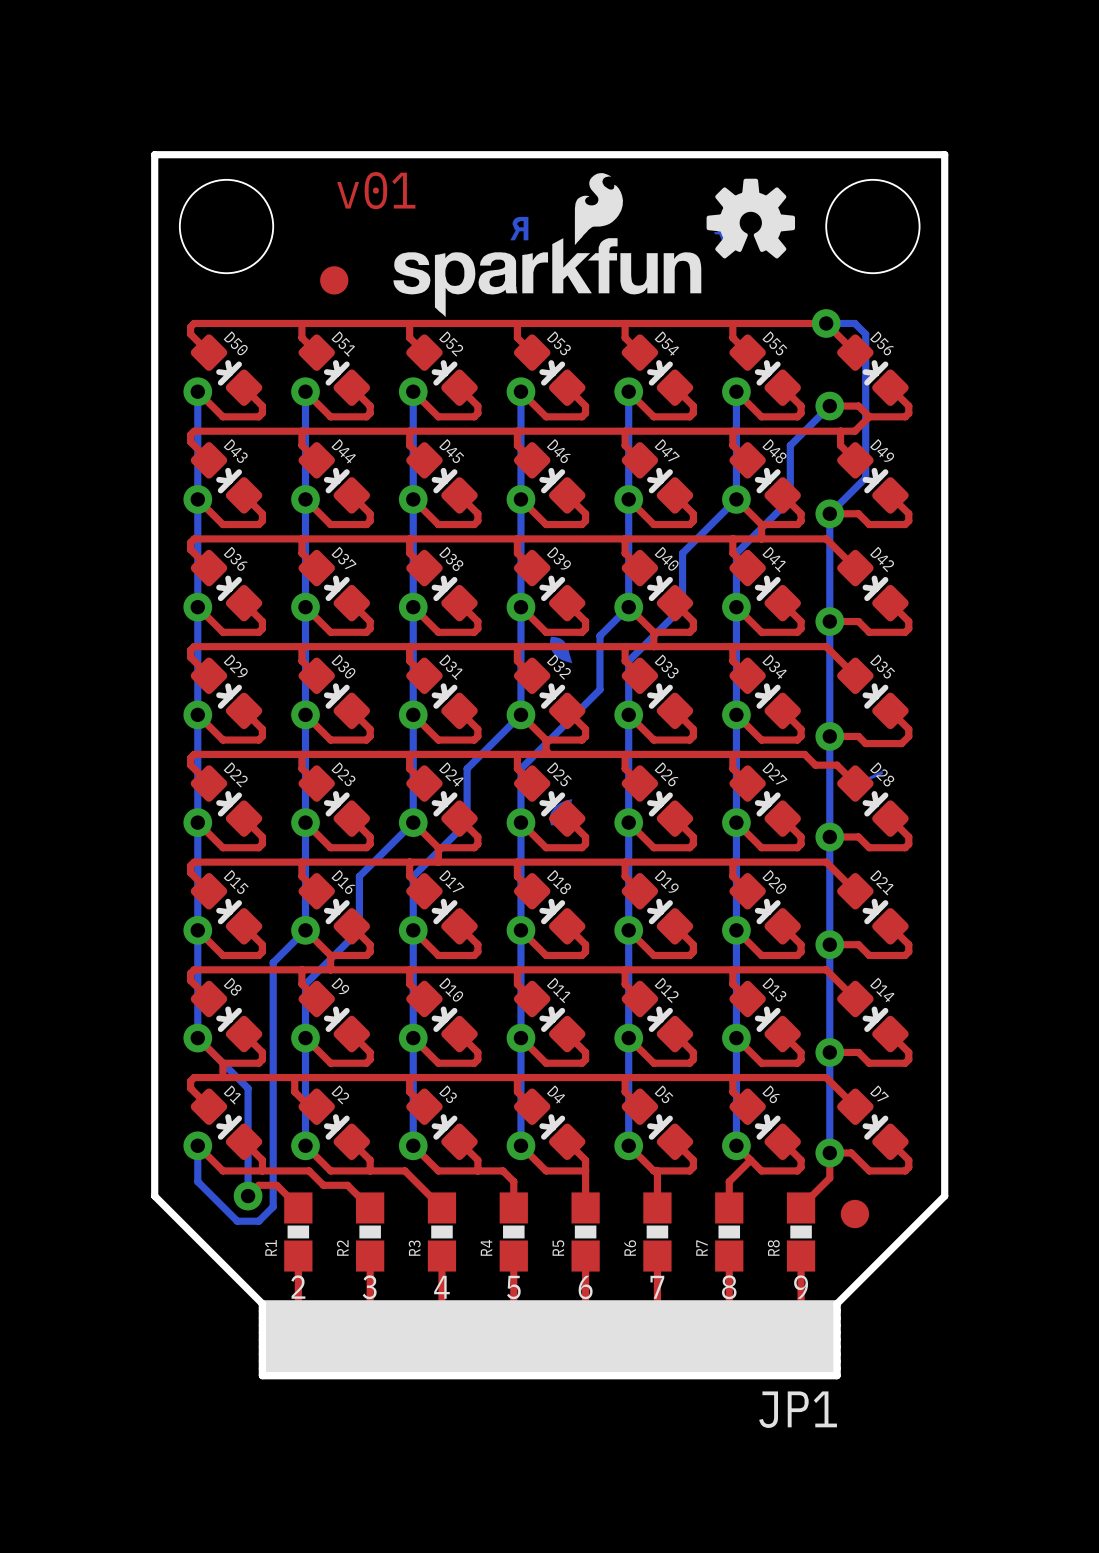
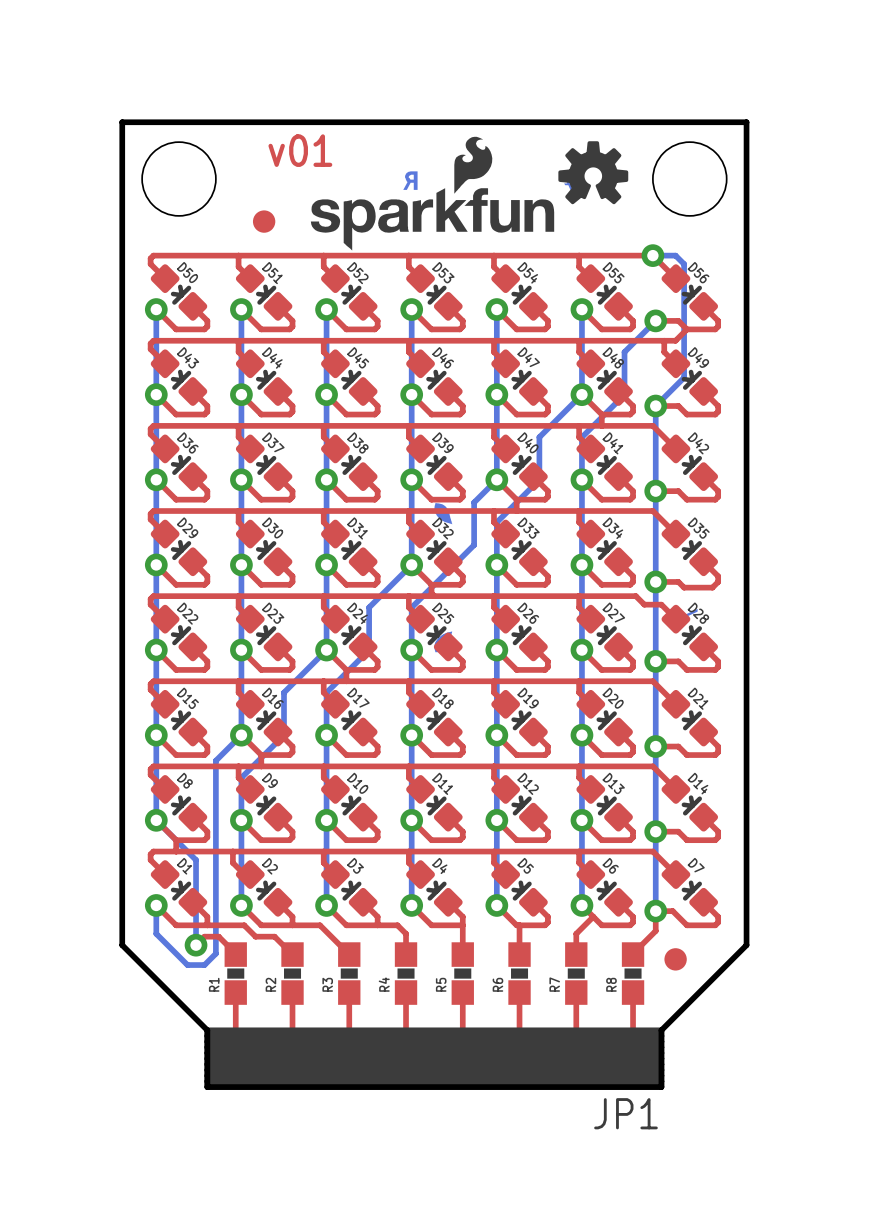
text: 2 (298, 1287) -> none
text: 3 (369, 1287) -> none
text: 4 (441, 1287) -> none
text: 5 (513, 1287) -> none
text: 6 (585, 1287) -> none
text: 7 (657, 1287) -> none
text: 8 (729, 1287) -> none
text: 9 (801, 1287) -> none

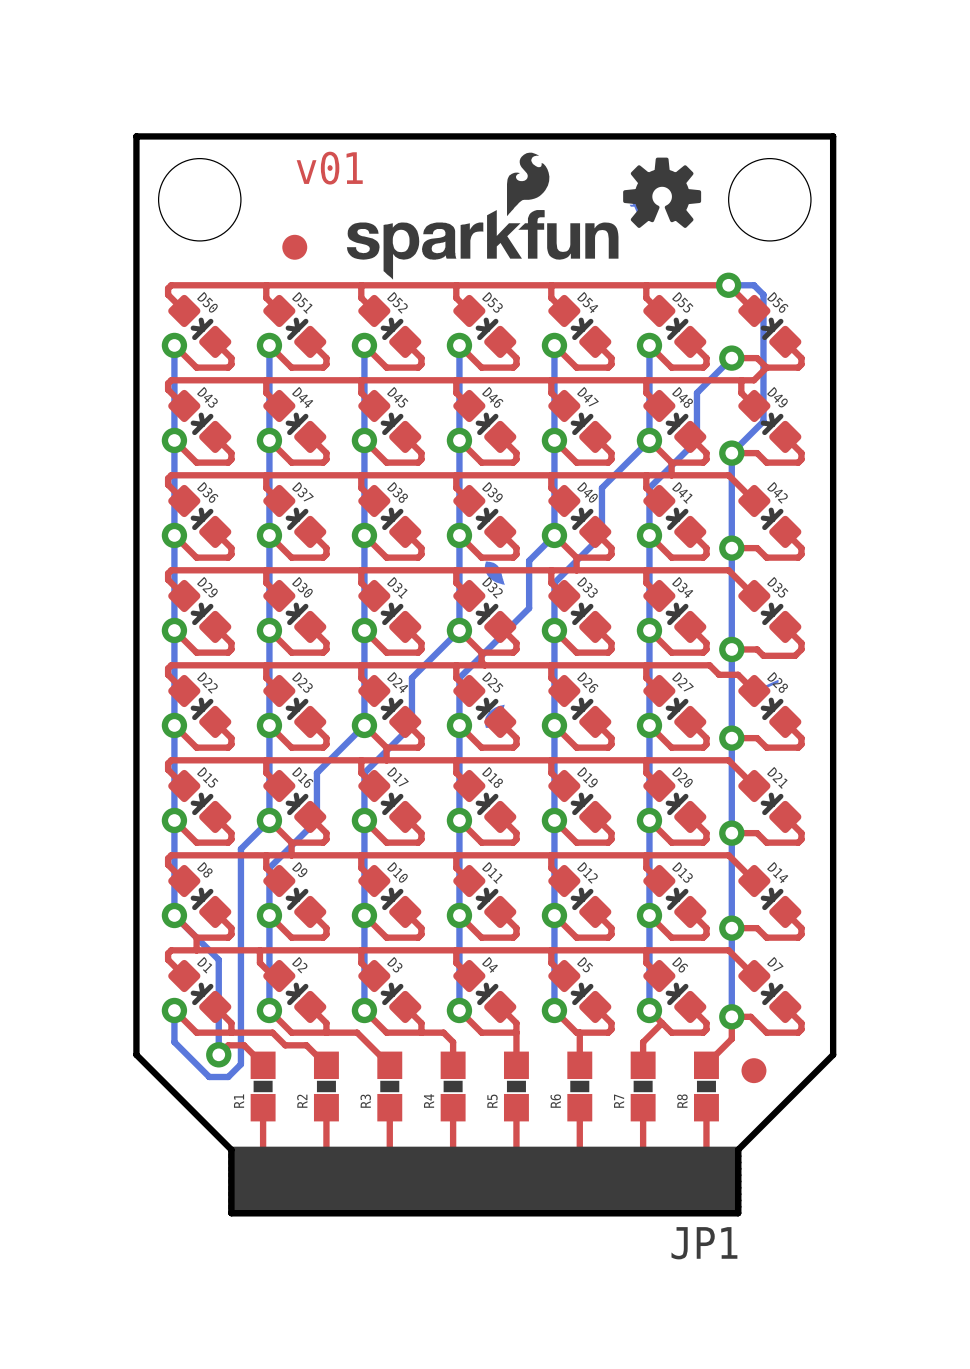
drawing: [403, 171, 580, 190] -> none

